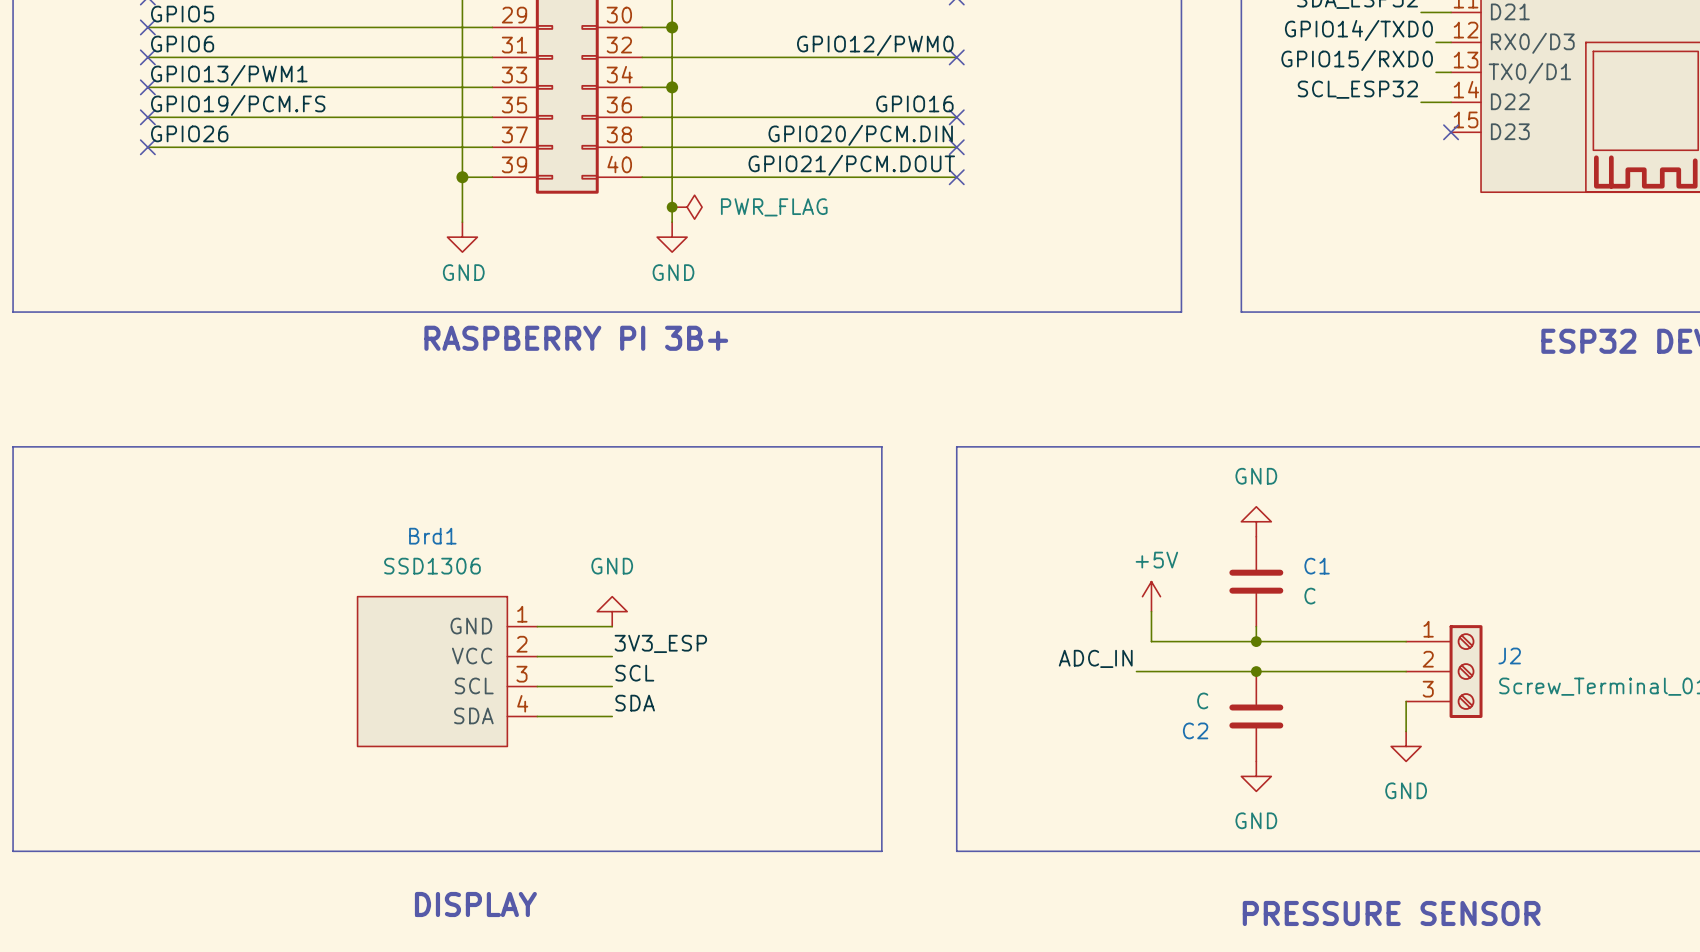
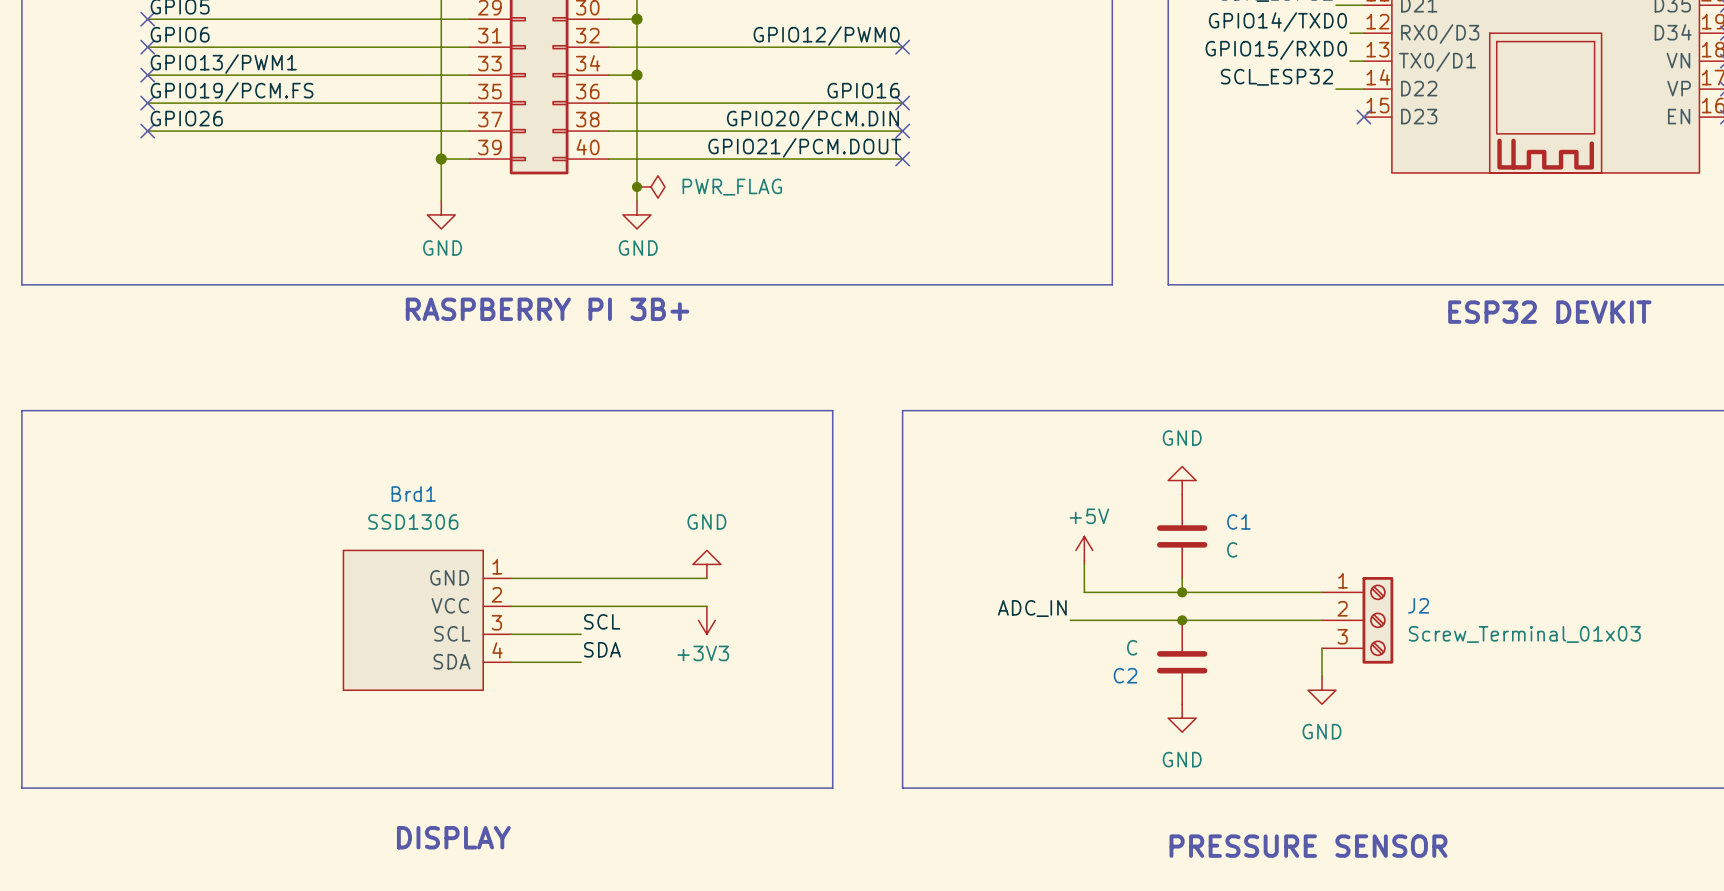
power symbol position: GND (612, 611) -> GND (706, 564)
wire: none -> (581, 578) (706, 578)
label: 3V3_ESP (660, 643) -> none
wire: none -> (581, 606) (706, 606)
power symbol: none -> +3V3 (706, 620)

